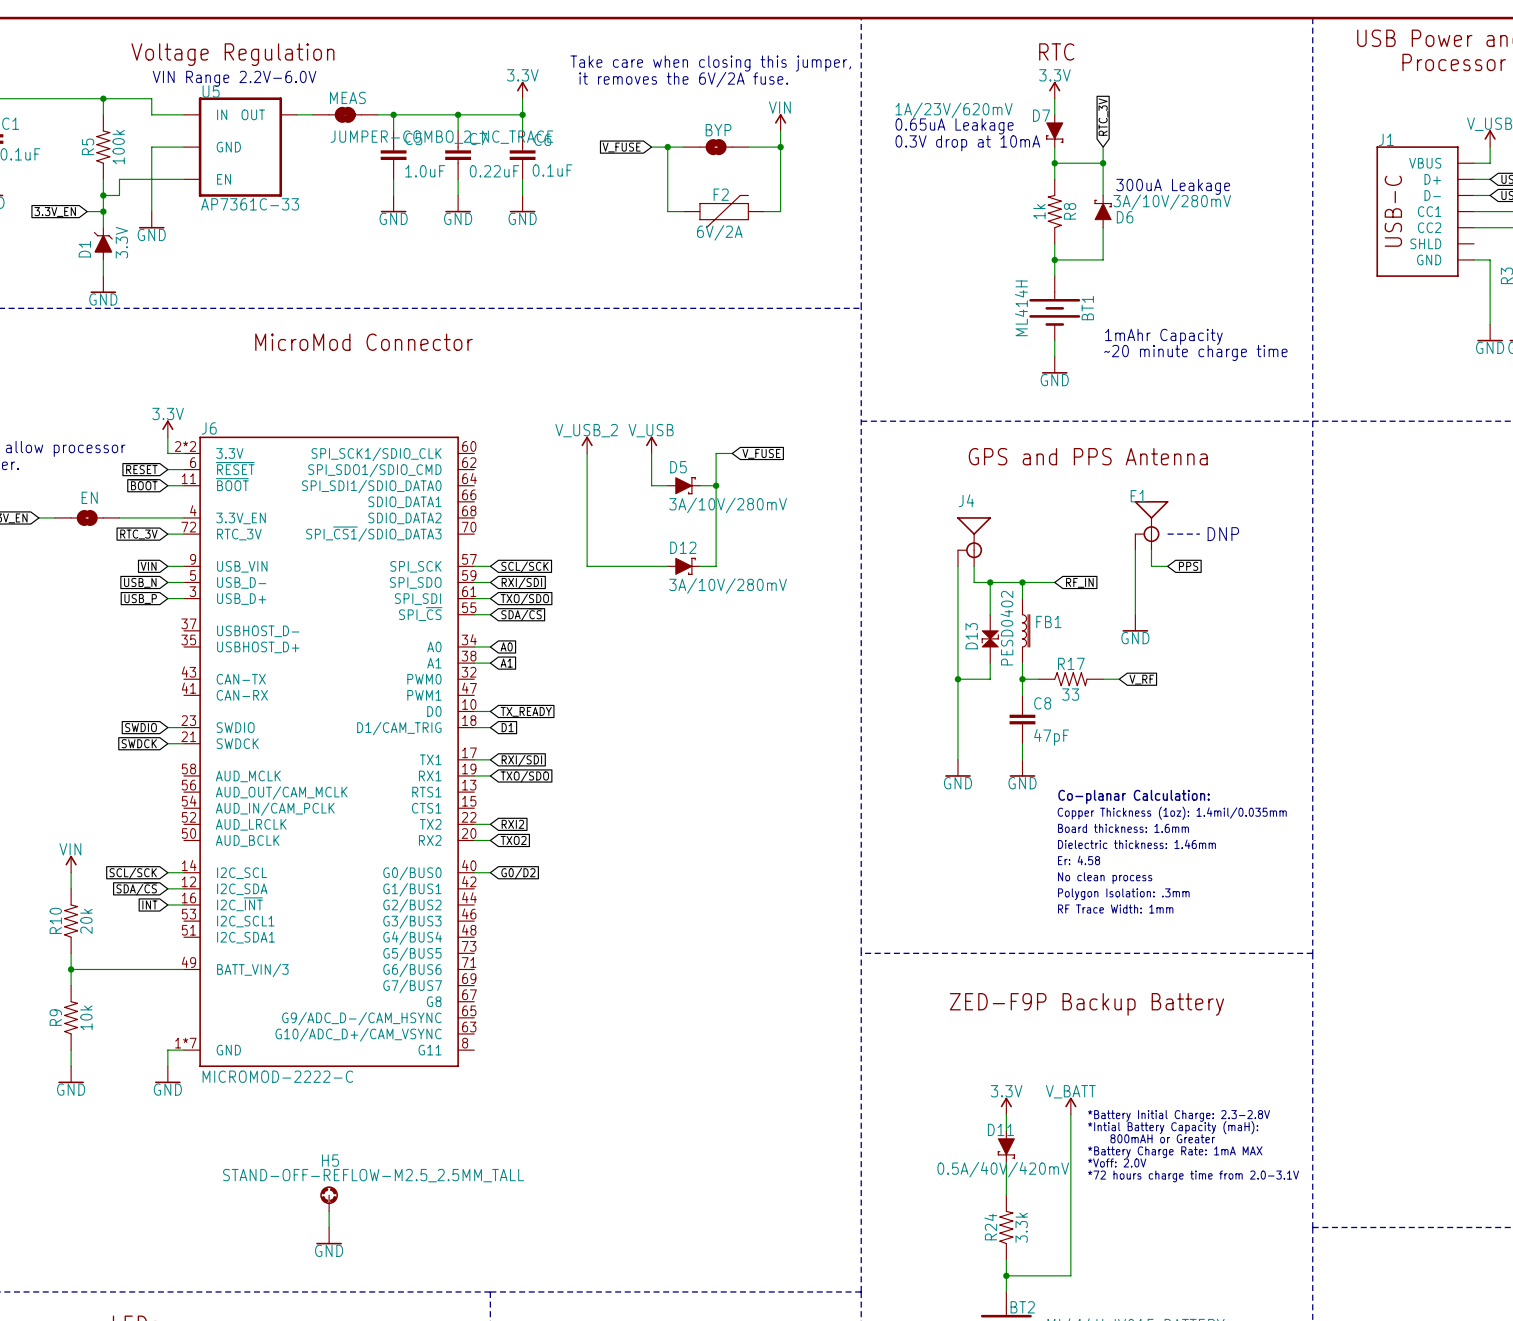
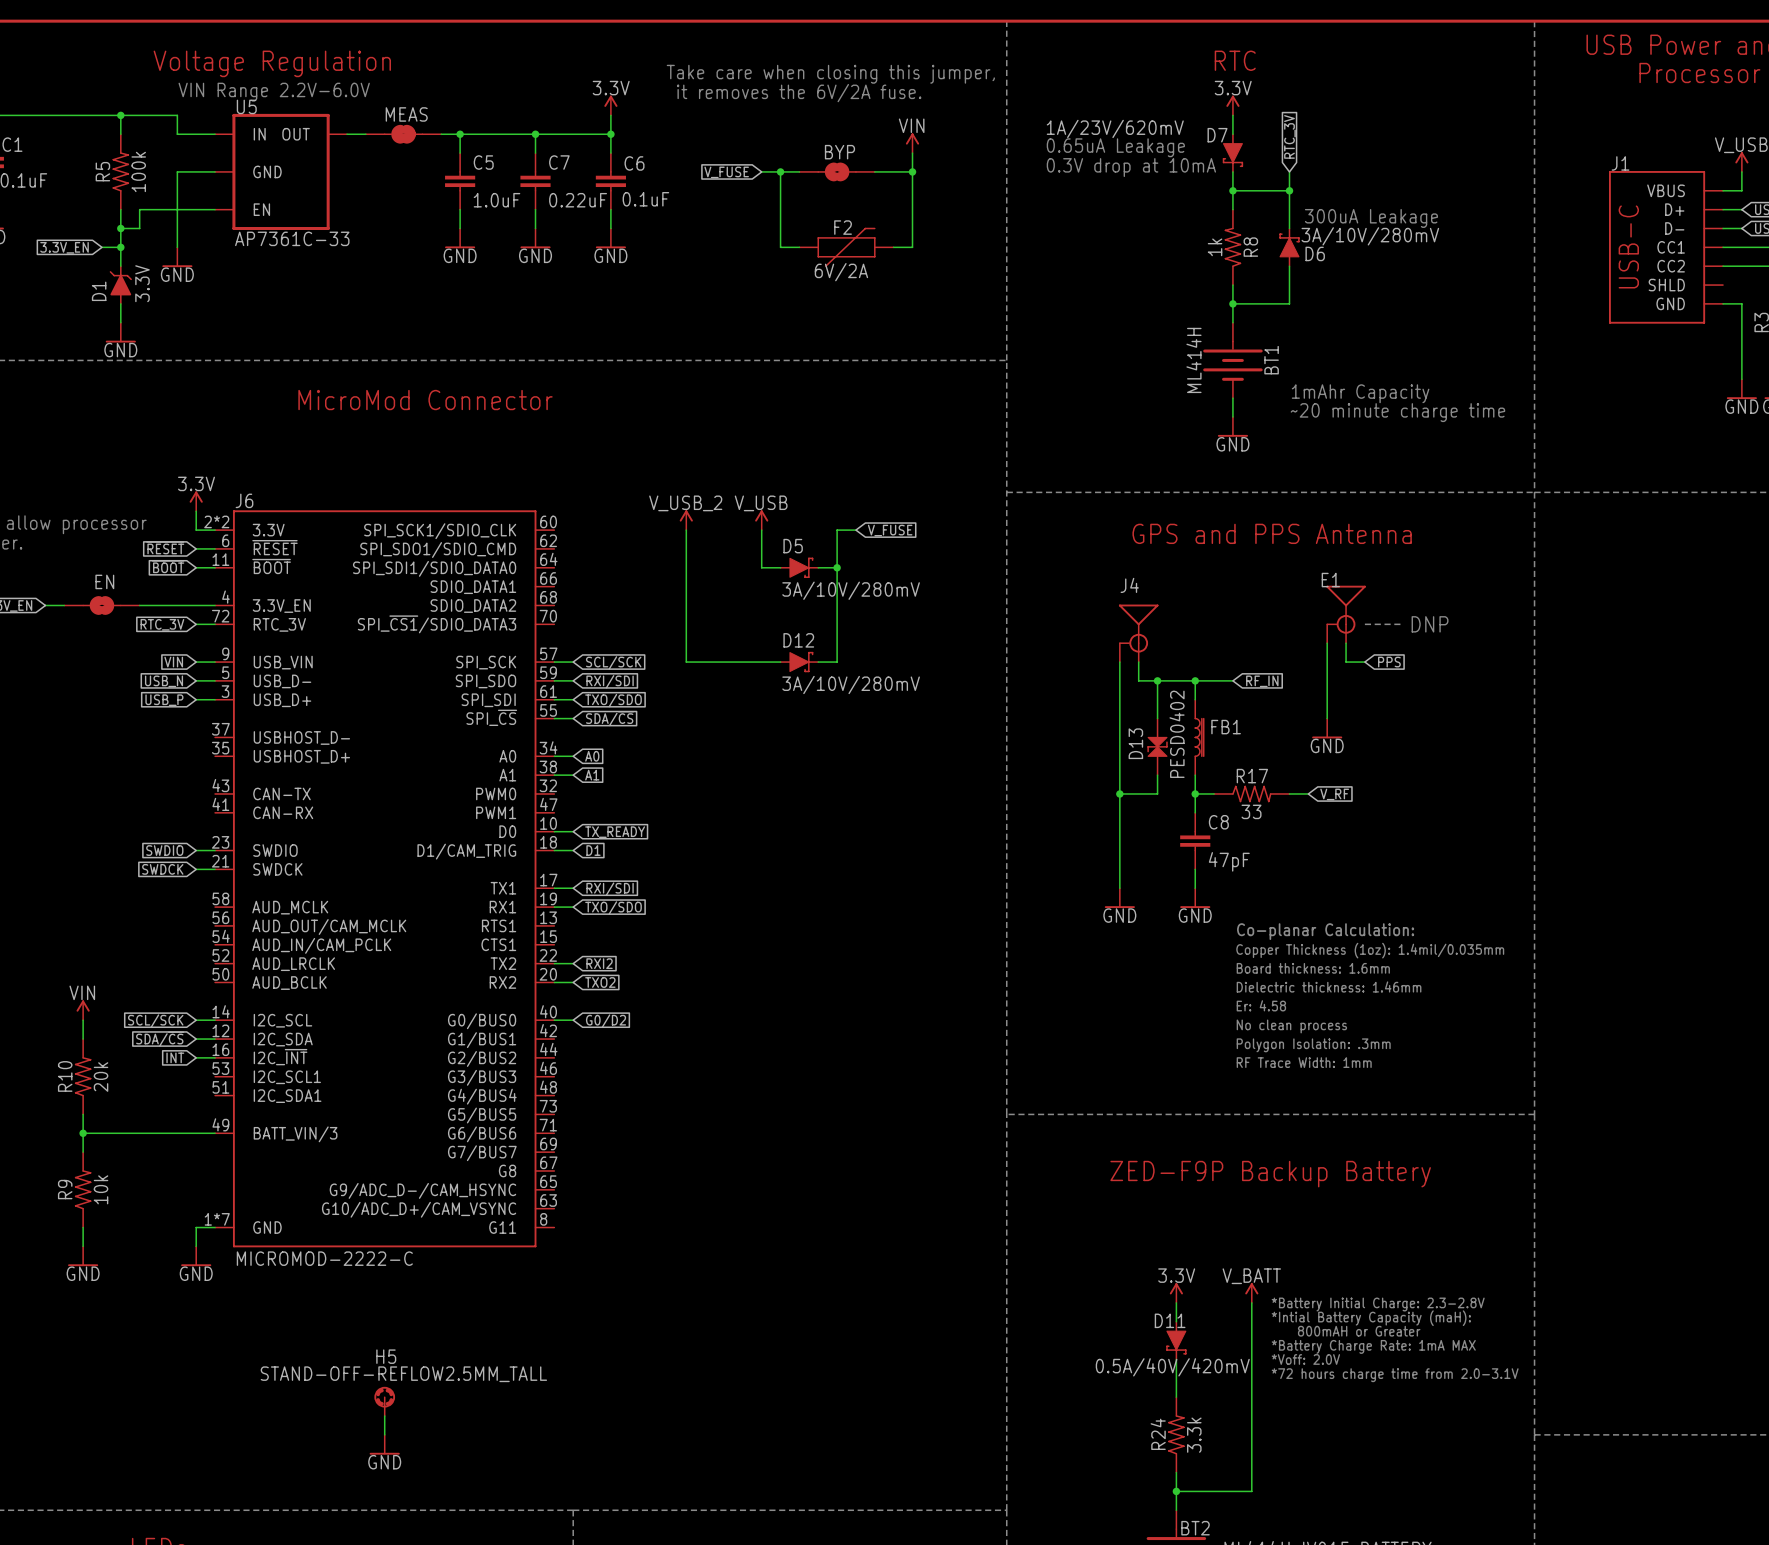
MEAS value: JUMPER-COMBO_2_NC_TRACE (441, 137) -> none
H5 value: STAND-OFF-REFLOW-M2.5_2.5MM_TALL (373, 1175) -> STAND-OFF-REFLOW2.5MM_TALL (403, 1374)

